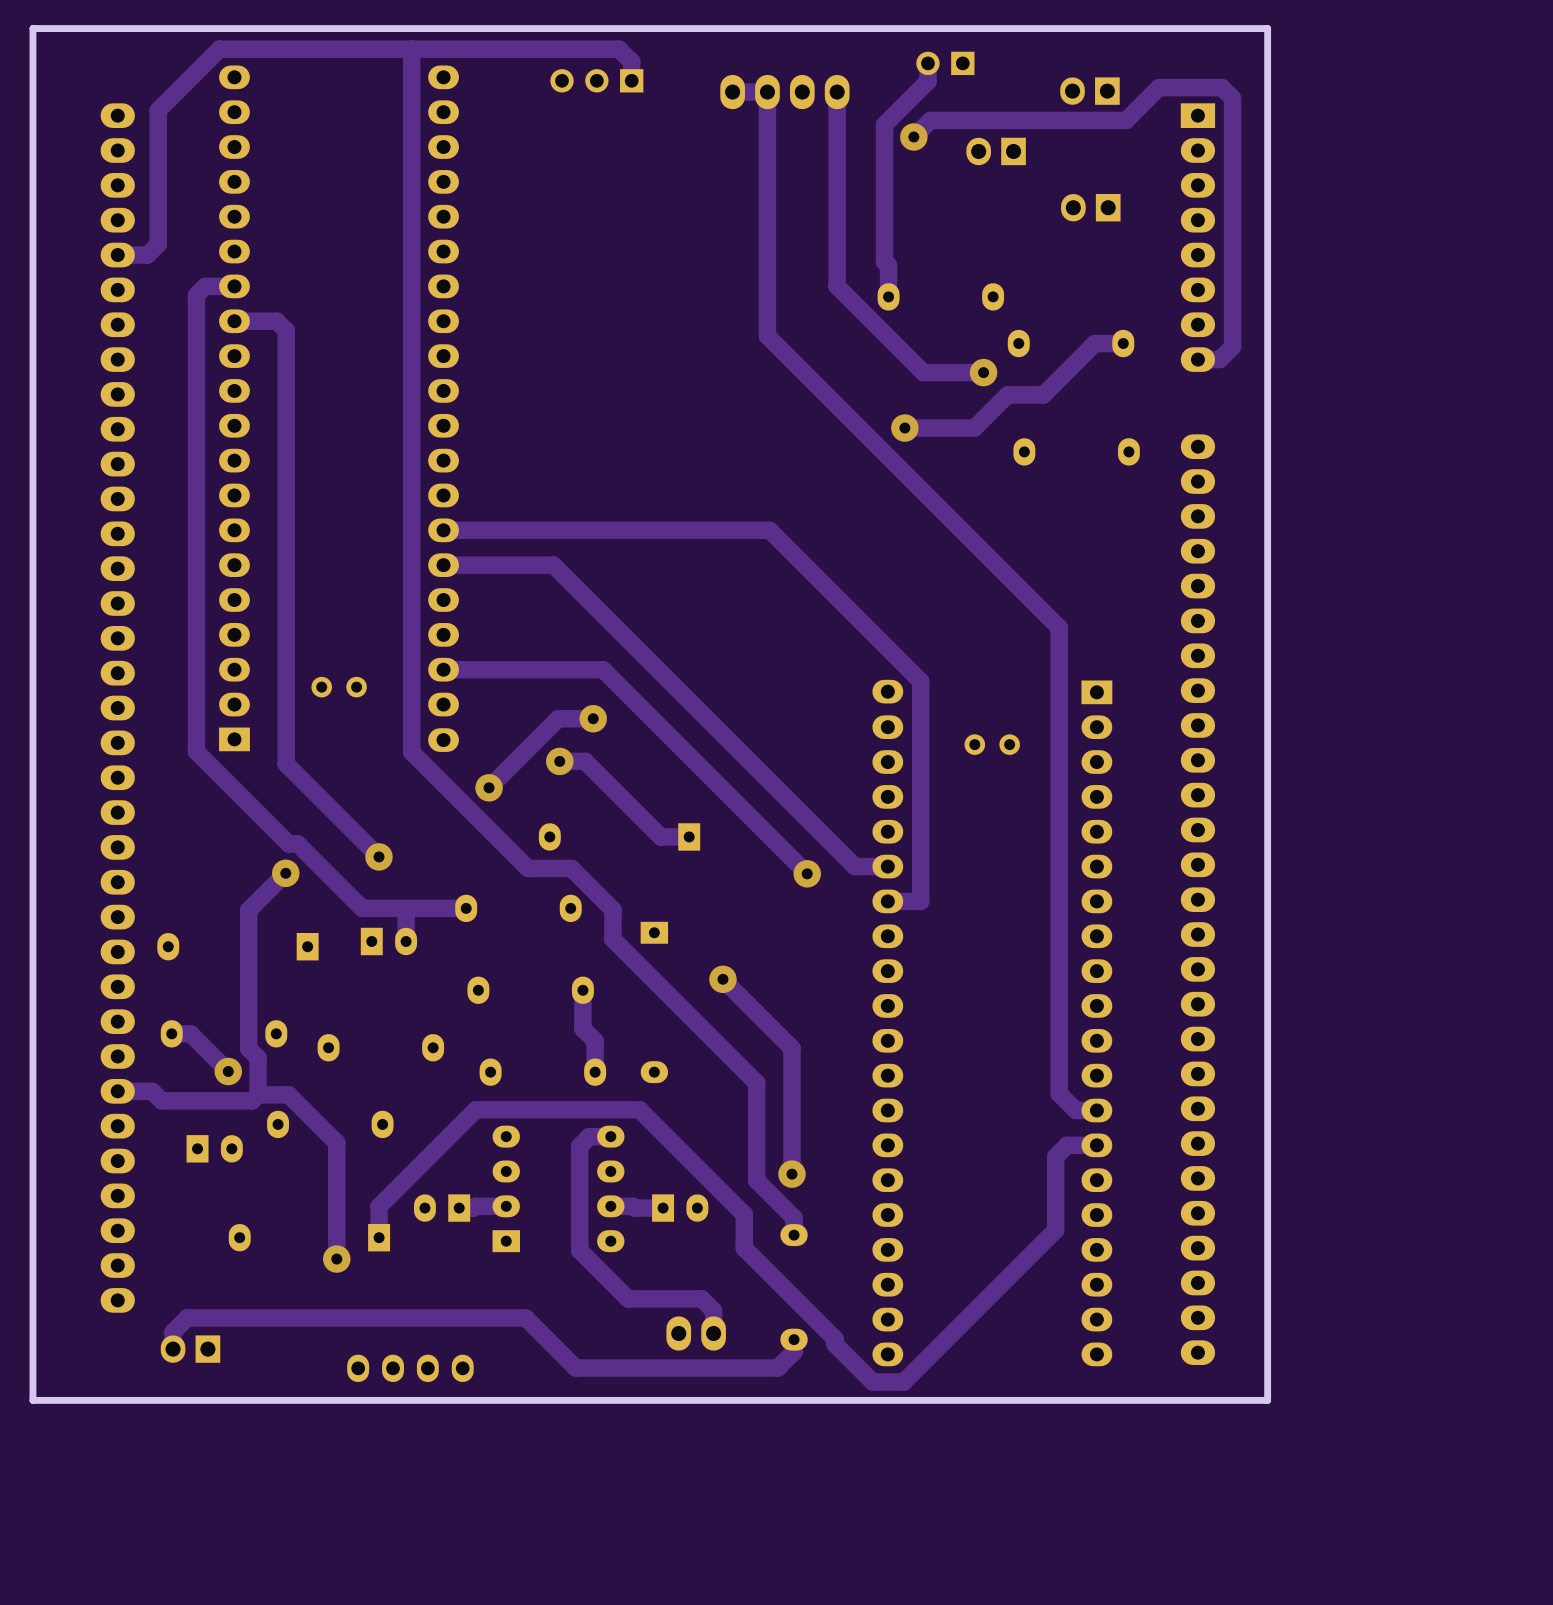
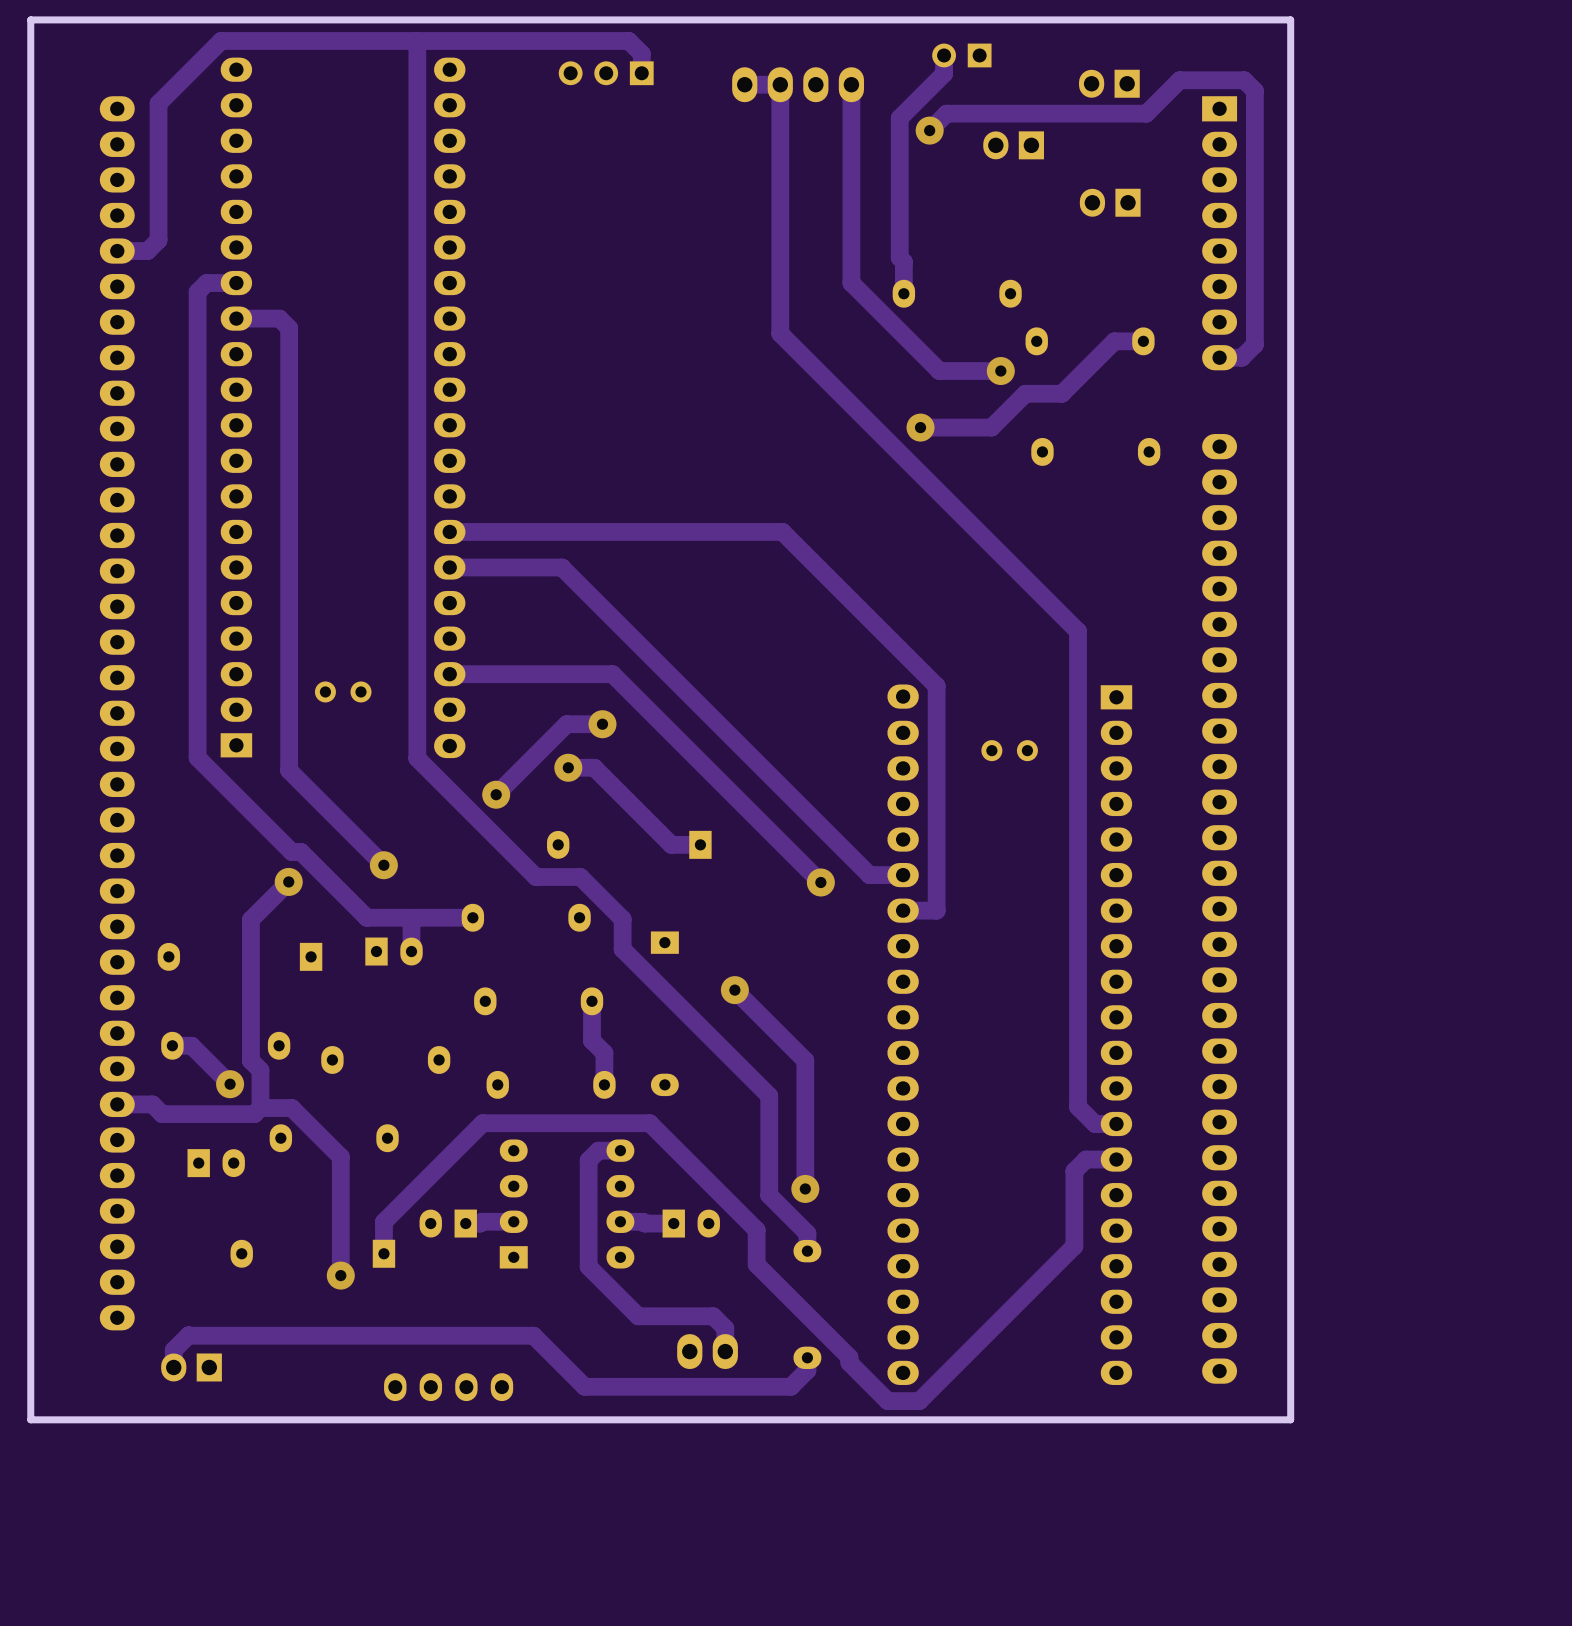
part position: (410, 1368) -> (448, 1387)

